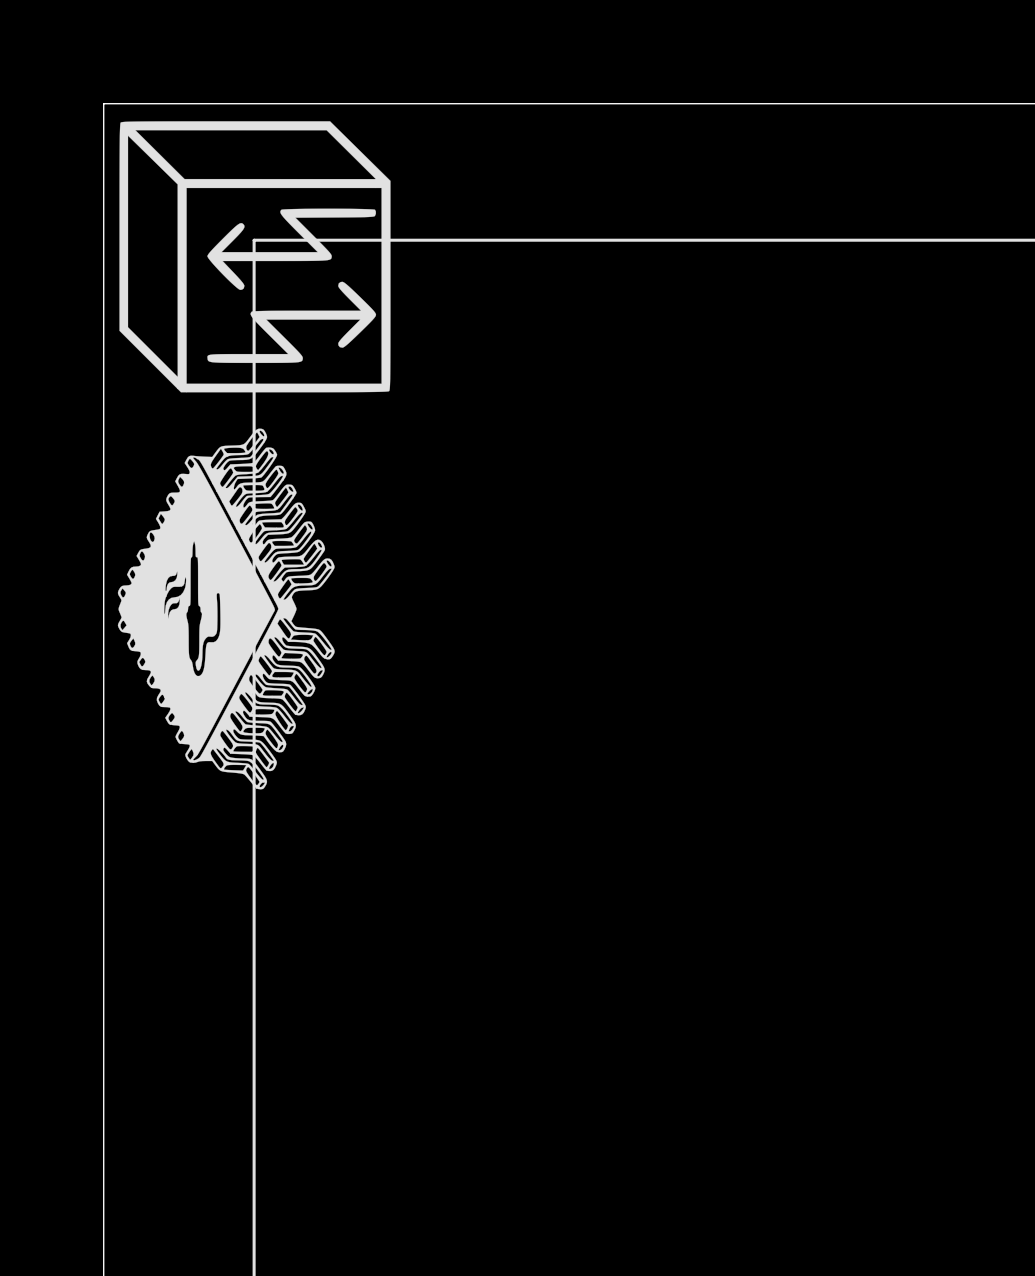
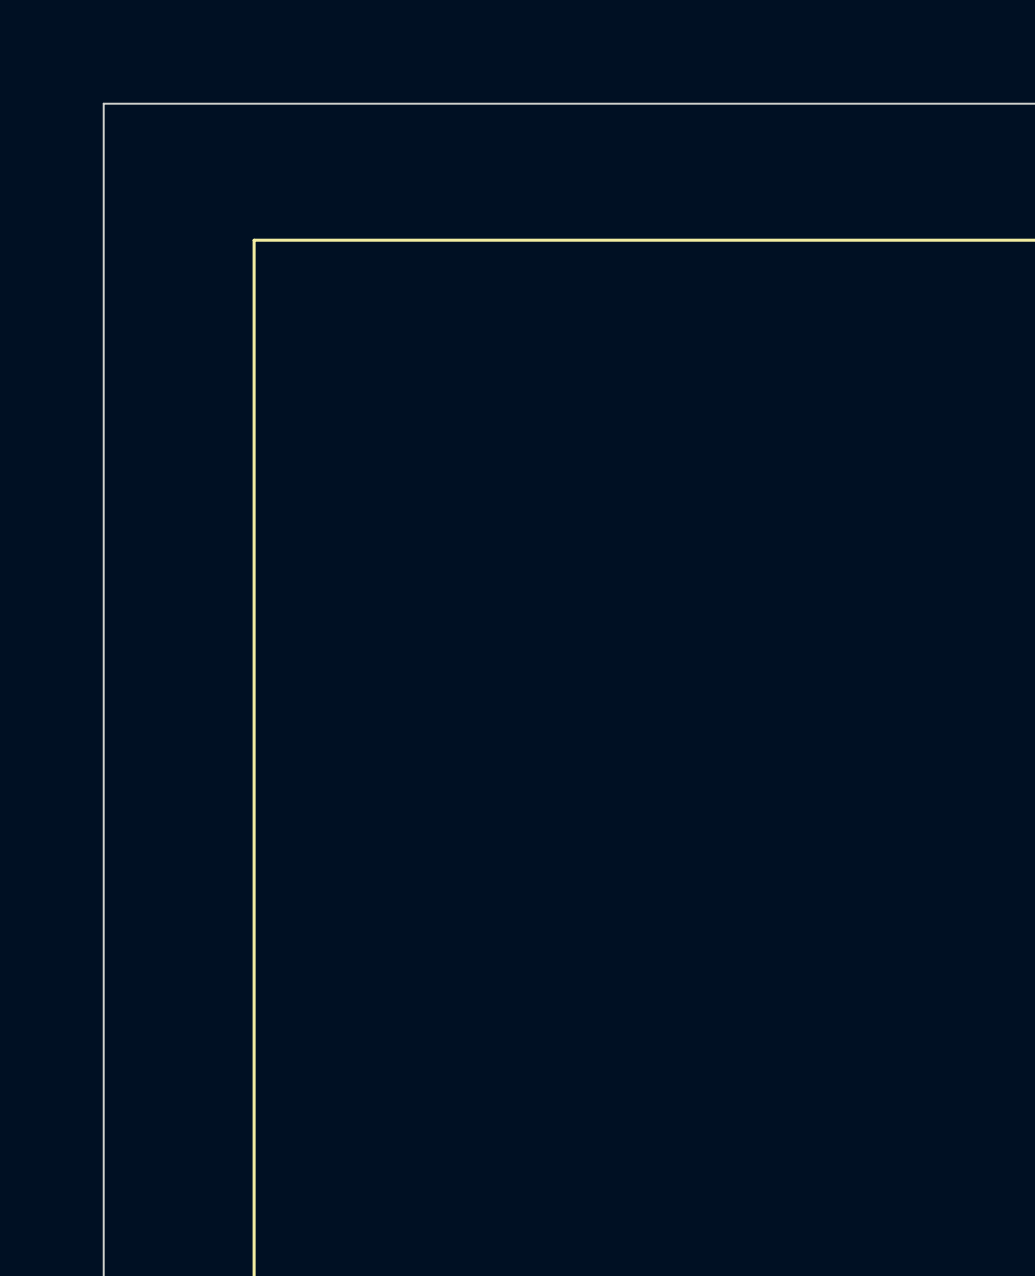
drawing: [119, 121, 391, 393] -> none
drawing: [117, 428, 335, 790] -> none

